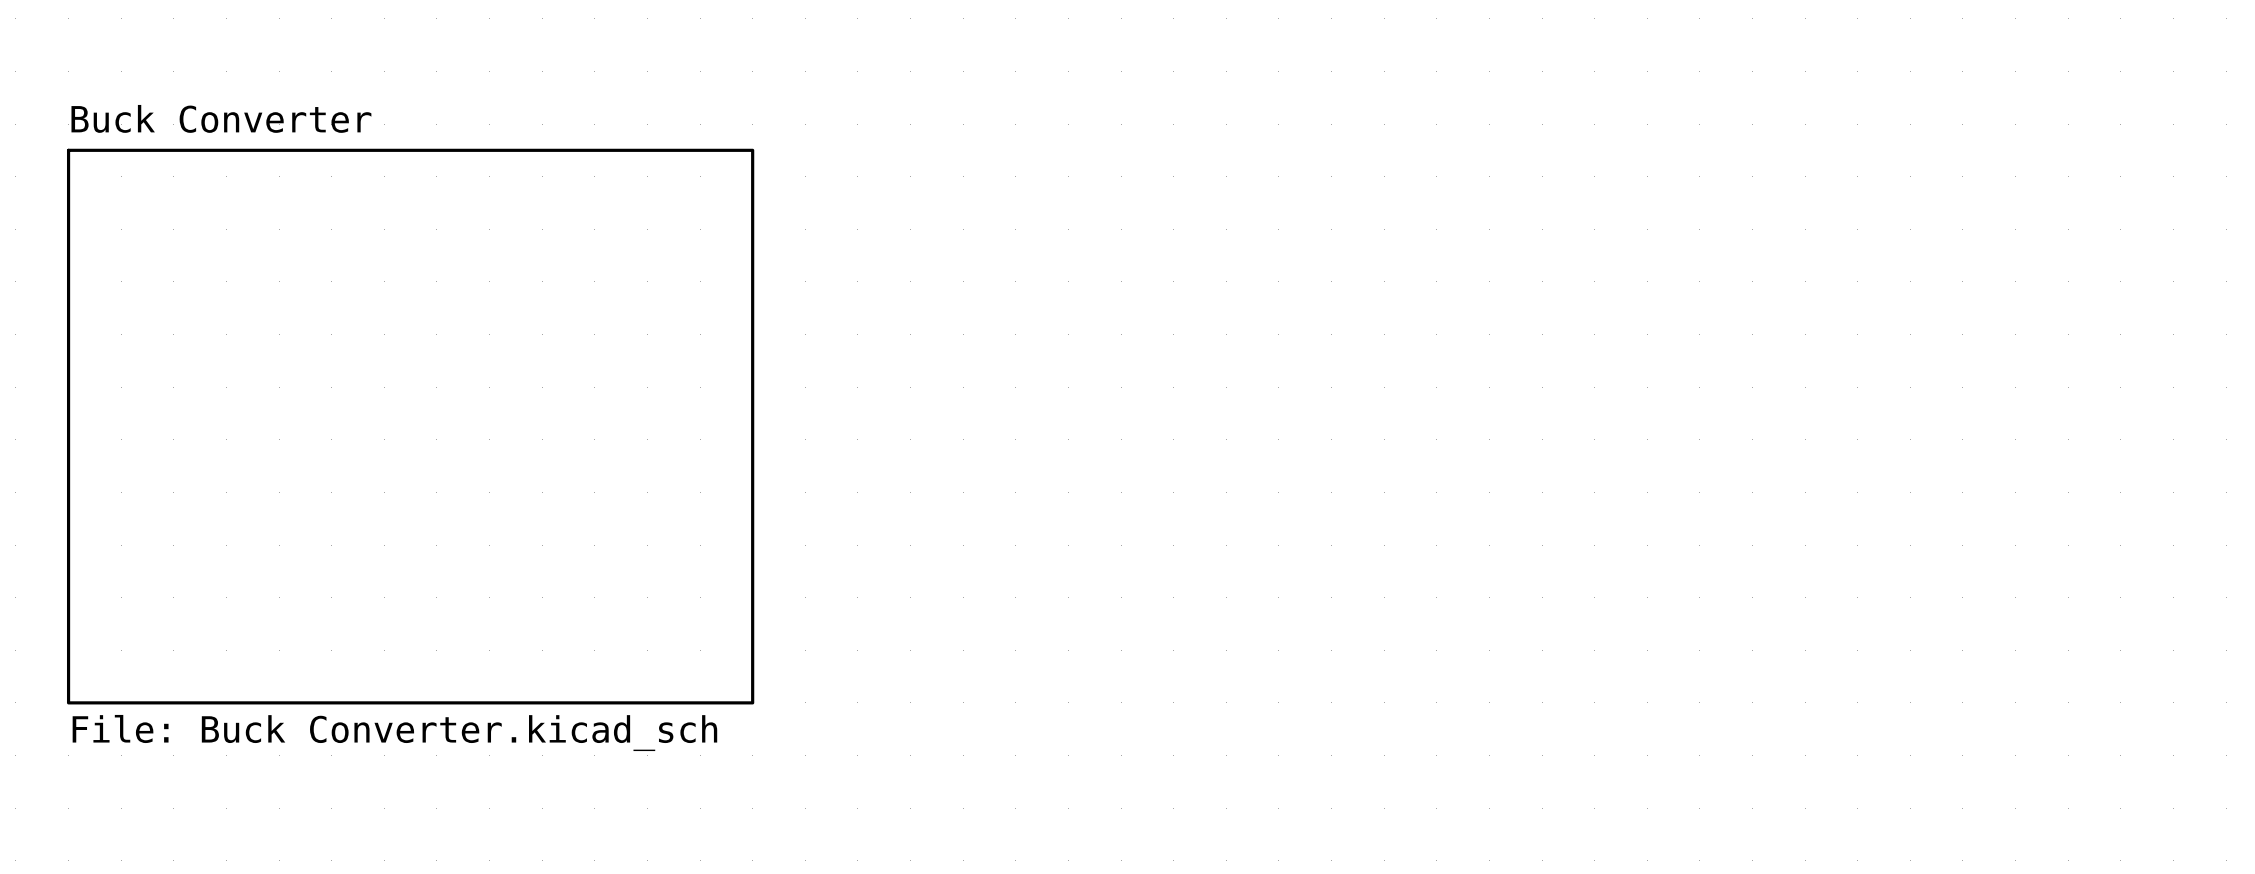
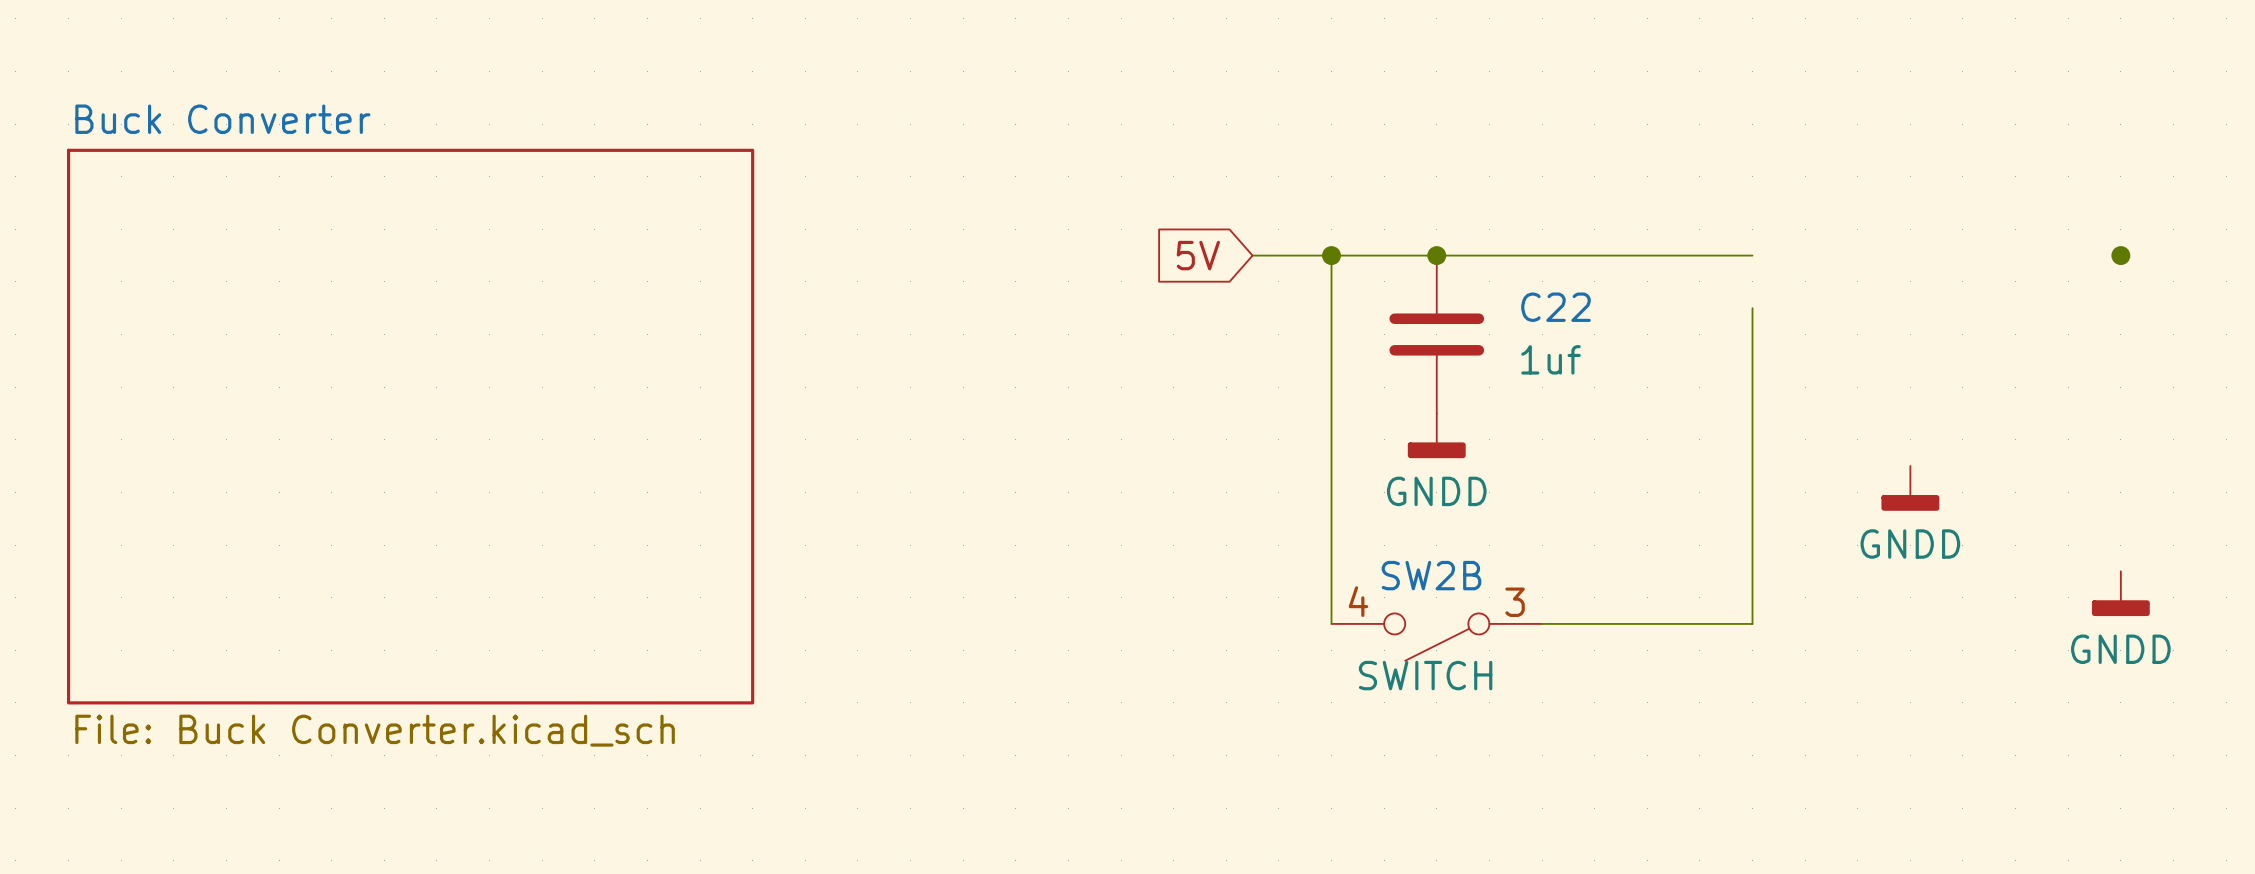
global label: none -> 5V (1198, 255)
wire: none -> (1252, 255) (1752, 255)
wire: none -> (1331, 255) (1331, 623)
junction: none -> (1331, 255)
junction: none -> (1436, 255)
junction: none -> (2120, 255)
wire: none -> (1752, 308) (1752, 623) (1542, 623)
C22: none -> 1uf (1436, 334)
power symbol: none -> GNDD (1436, 435)
power symbol: none -> GNDD (1910, 488)
power symbol: none -> GNDD (2120, 593)
SW2B: none -> SWITCH (1436, 637)

